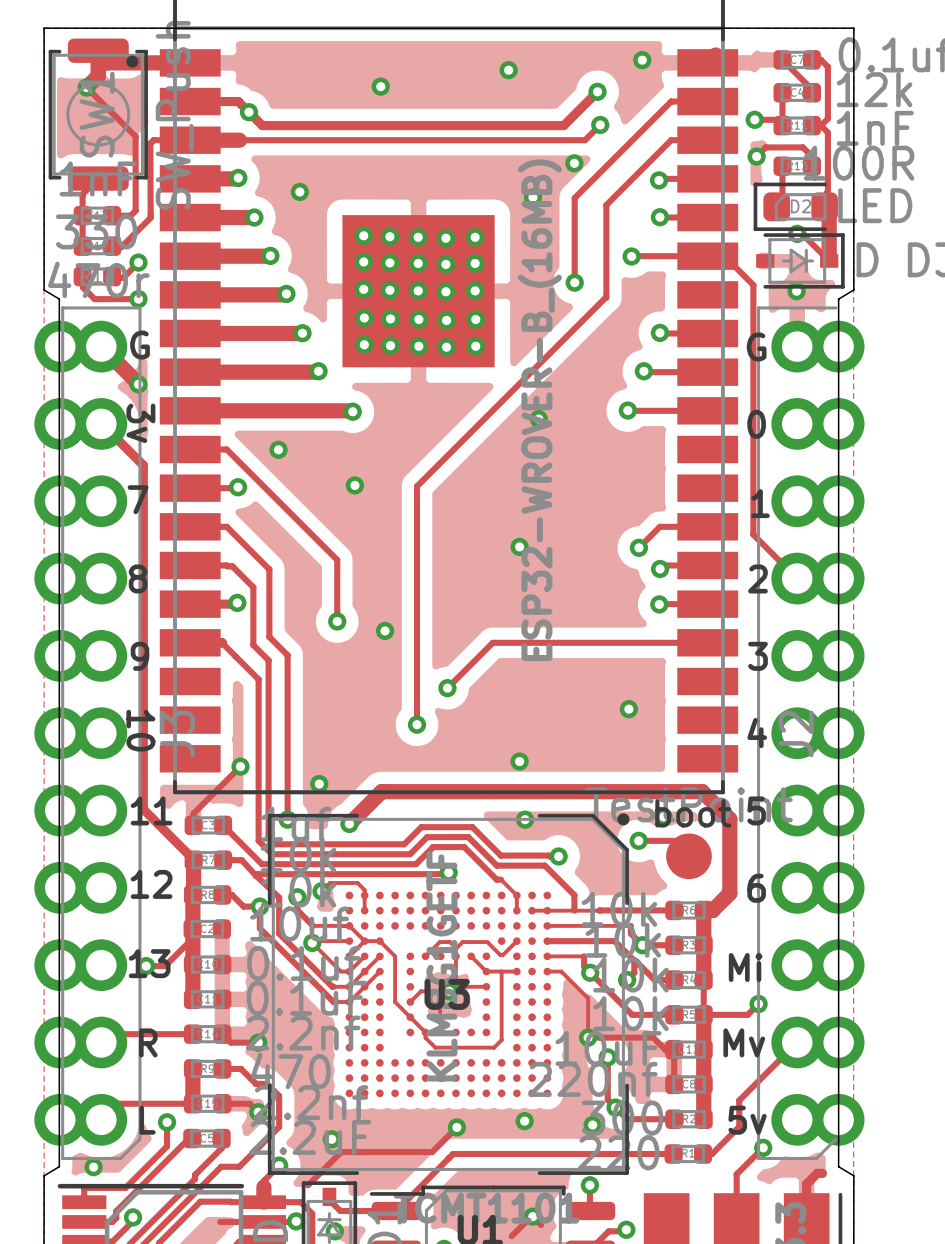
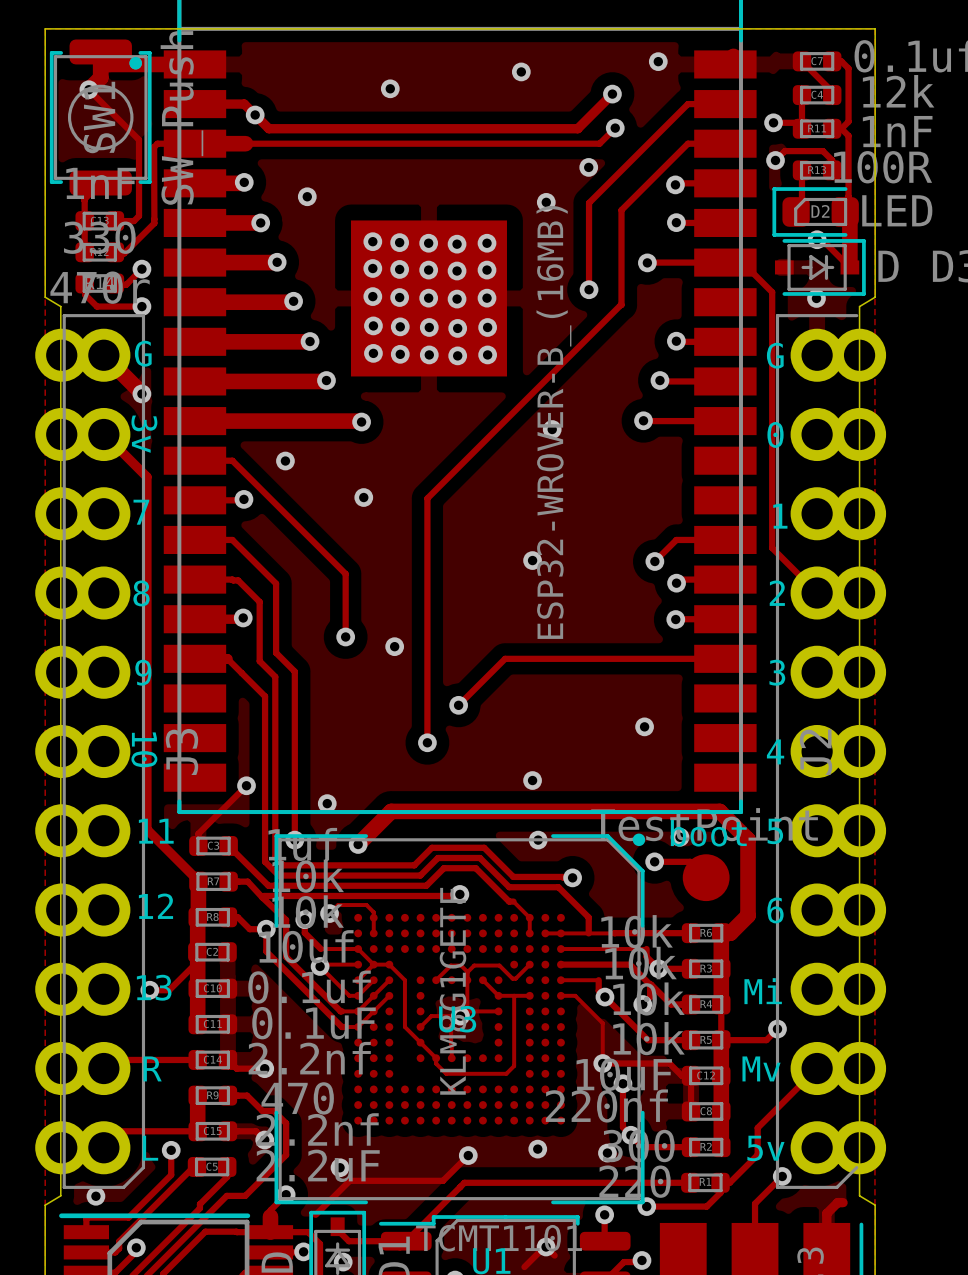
track: none -> (720, 1182) (720, 1192) (706, 1206) (646, 1206)
via: none -> (646, 1206)
track: (220, 1221) (263, 1221) -> none

